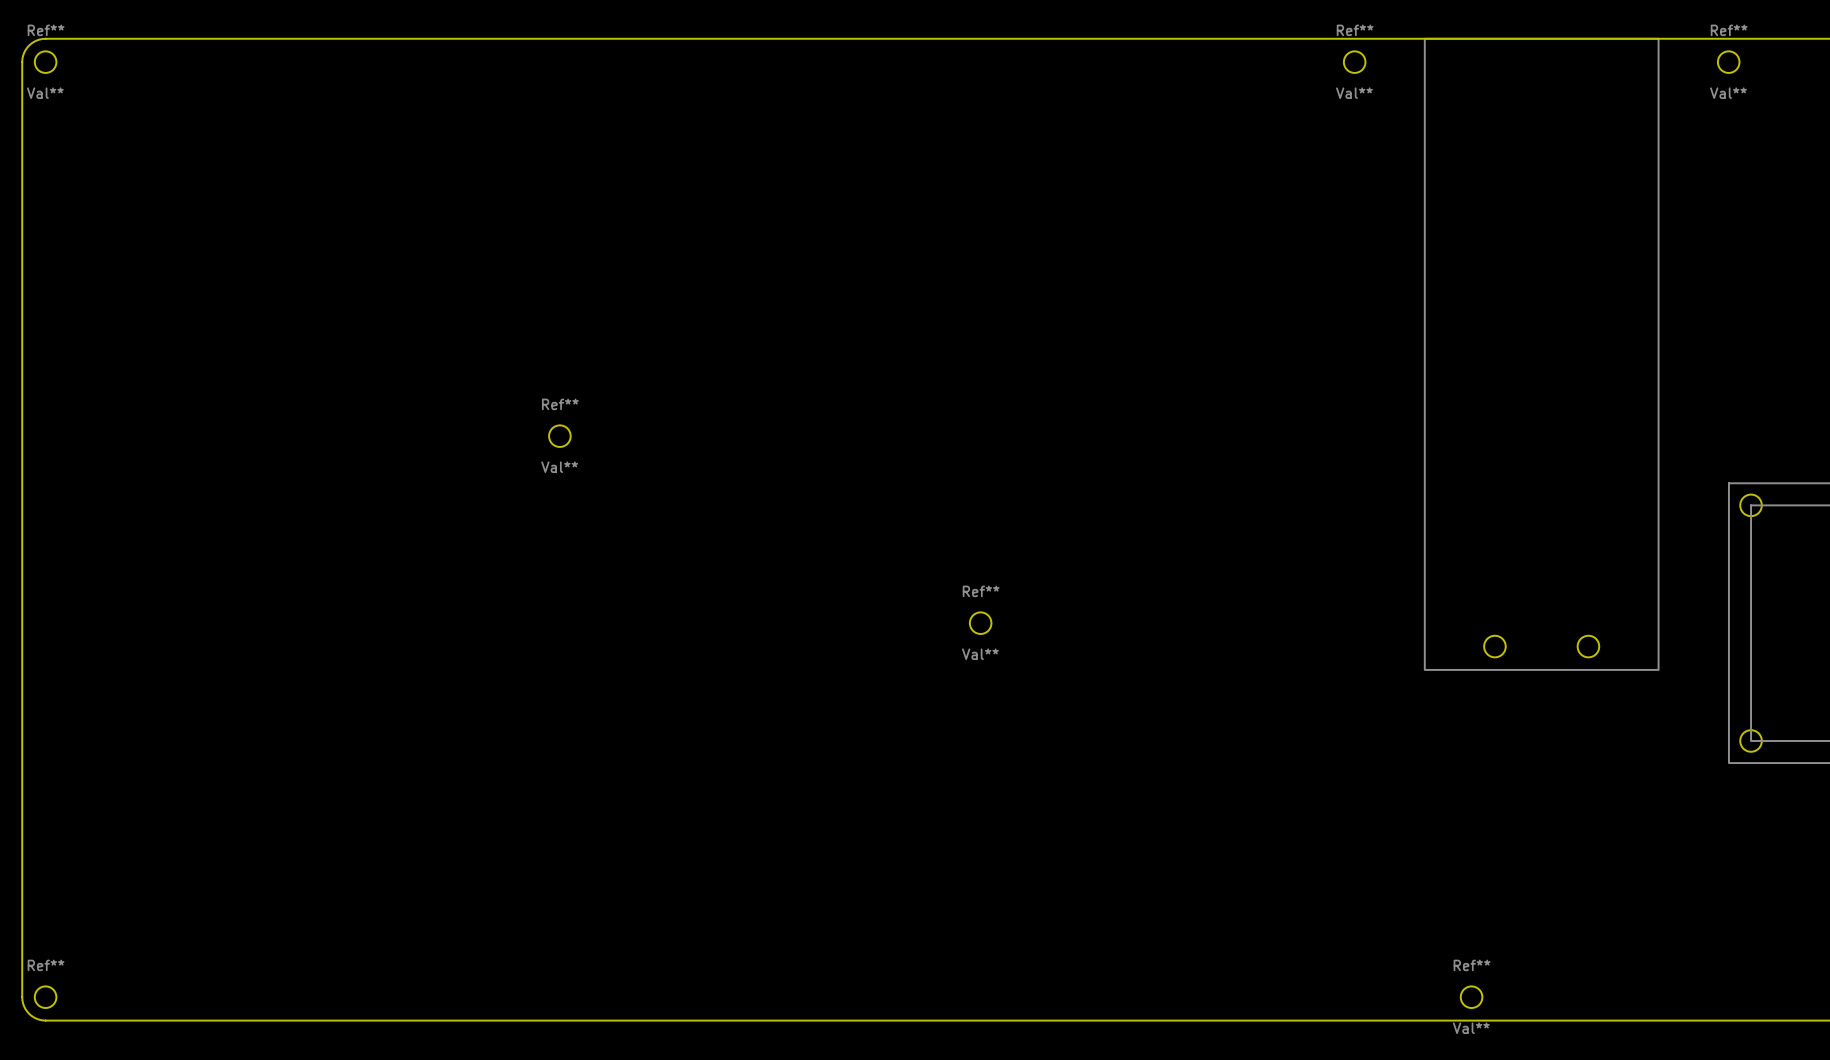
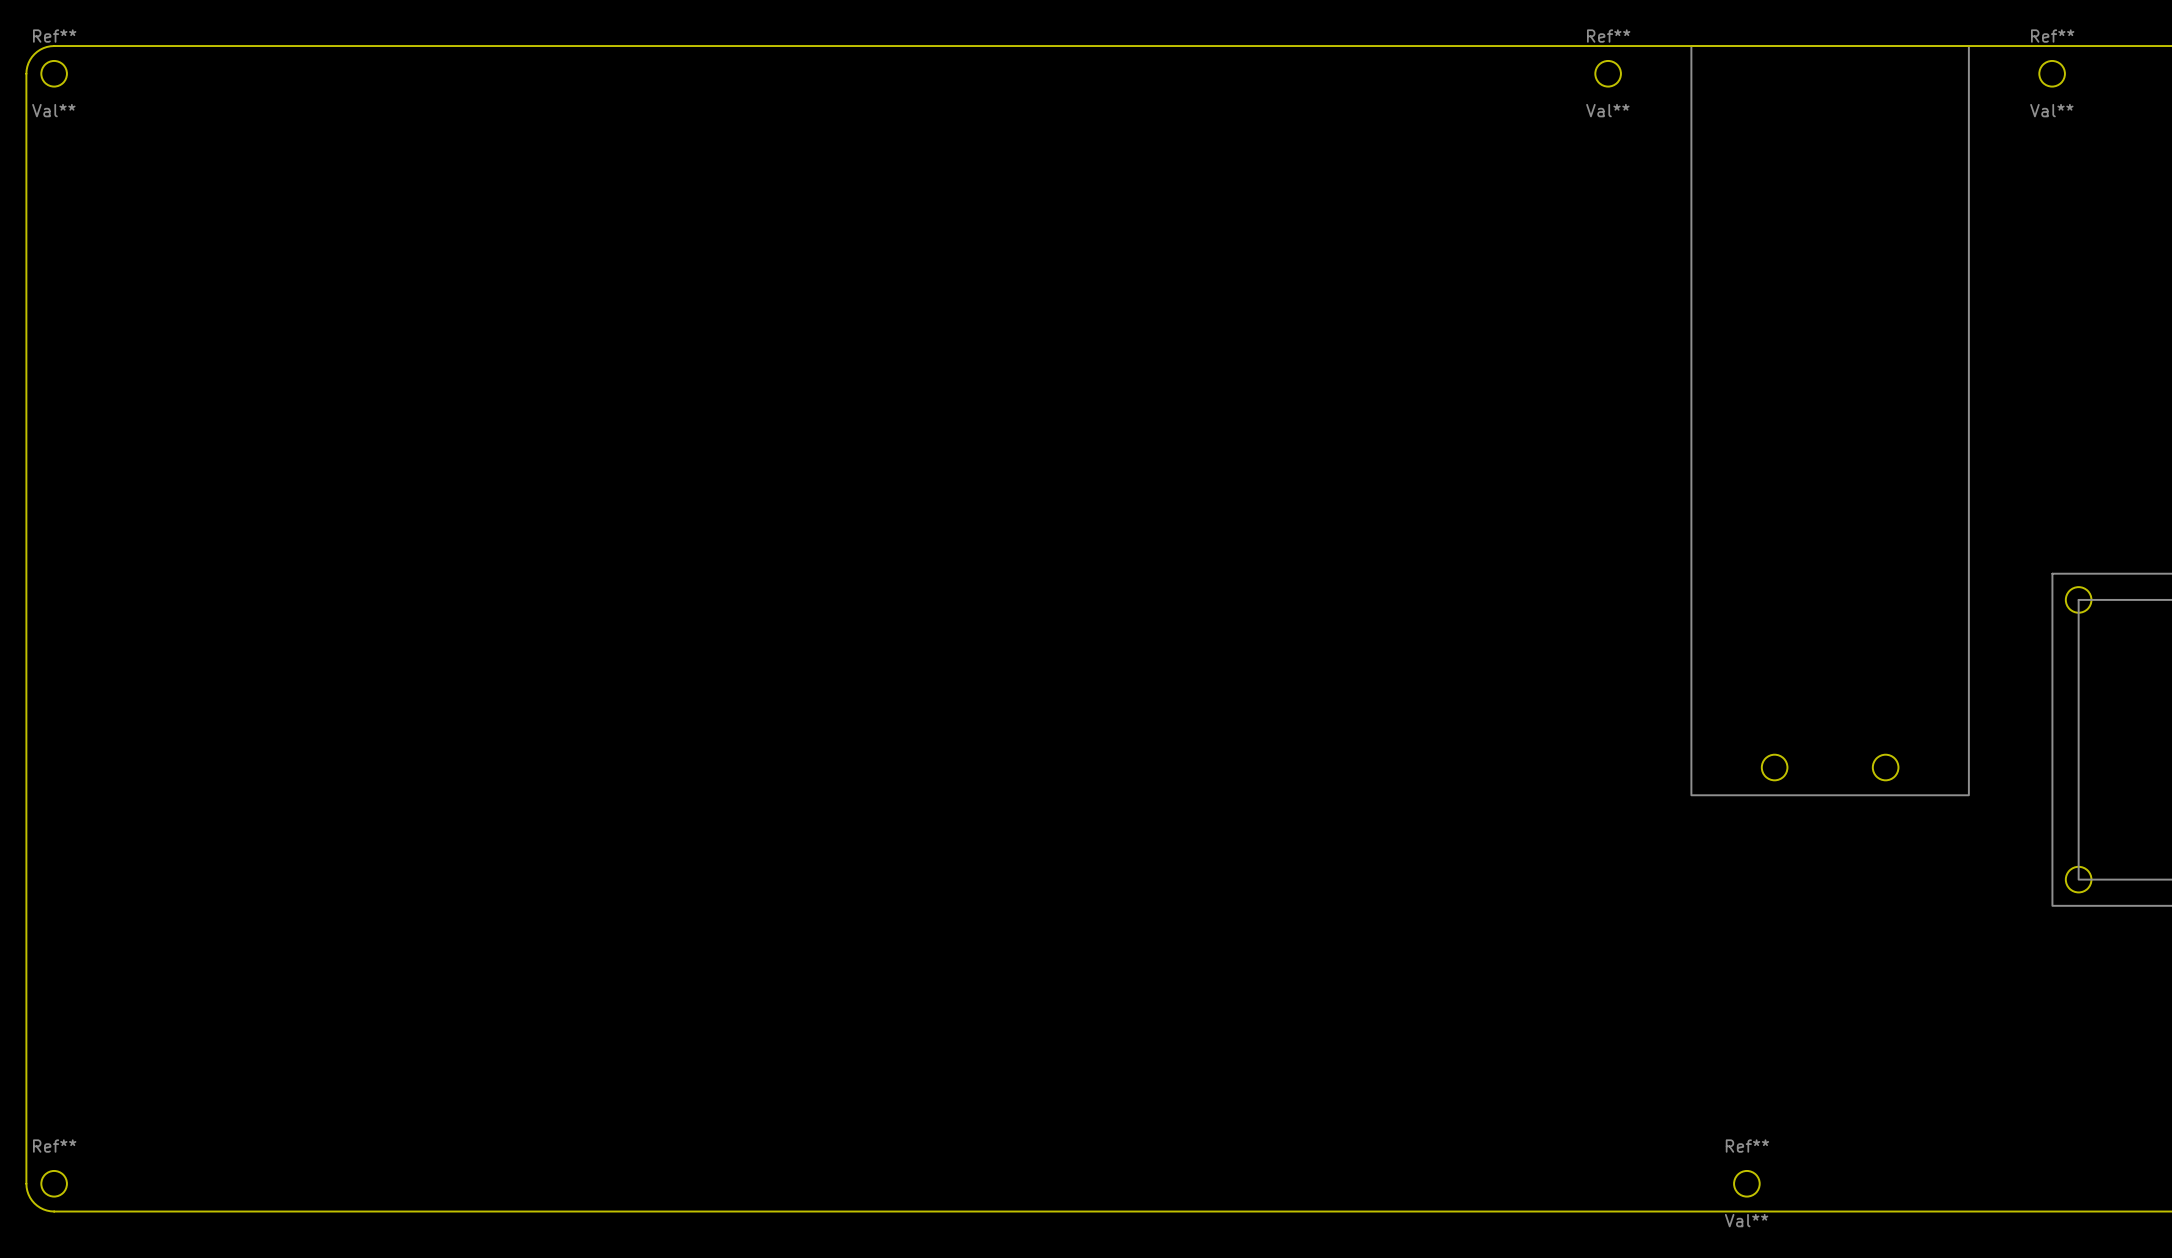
Ref**: Val** (559, 436) -> none
Ref**: Val** (980, 623) -> none

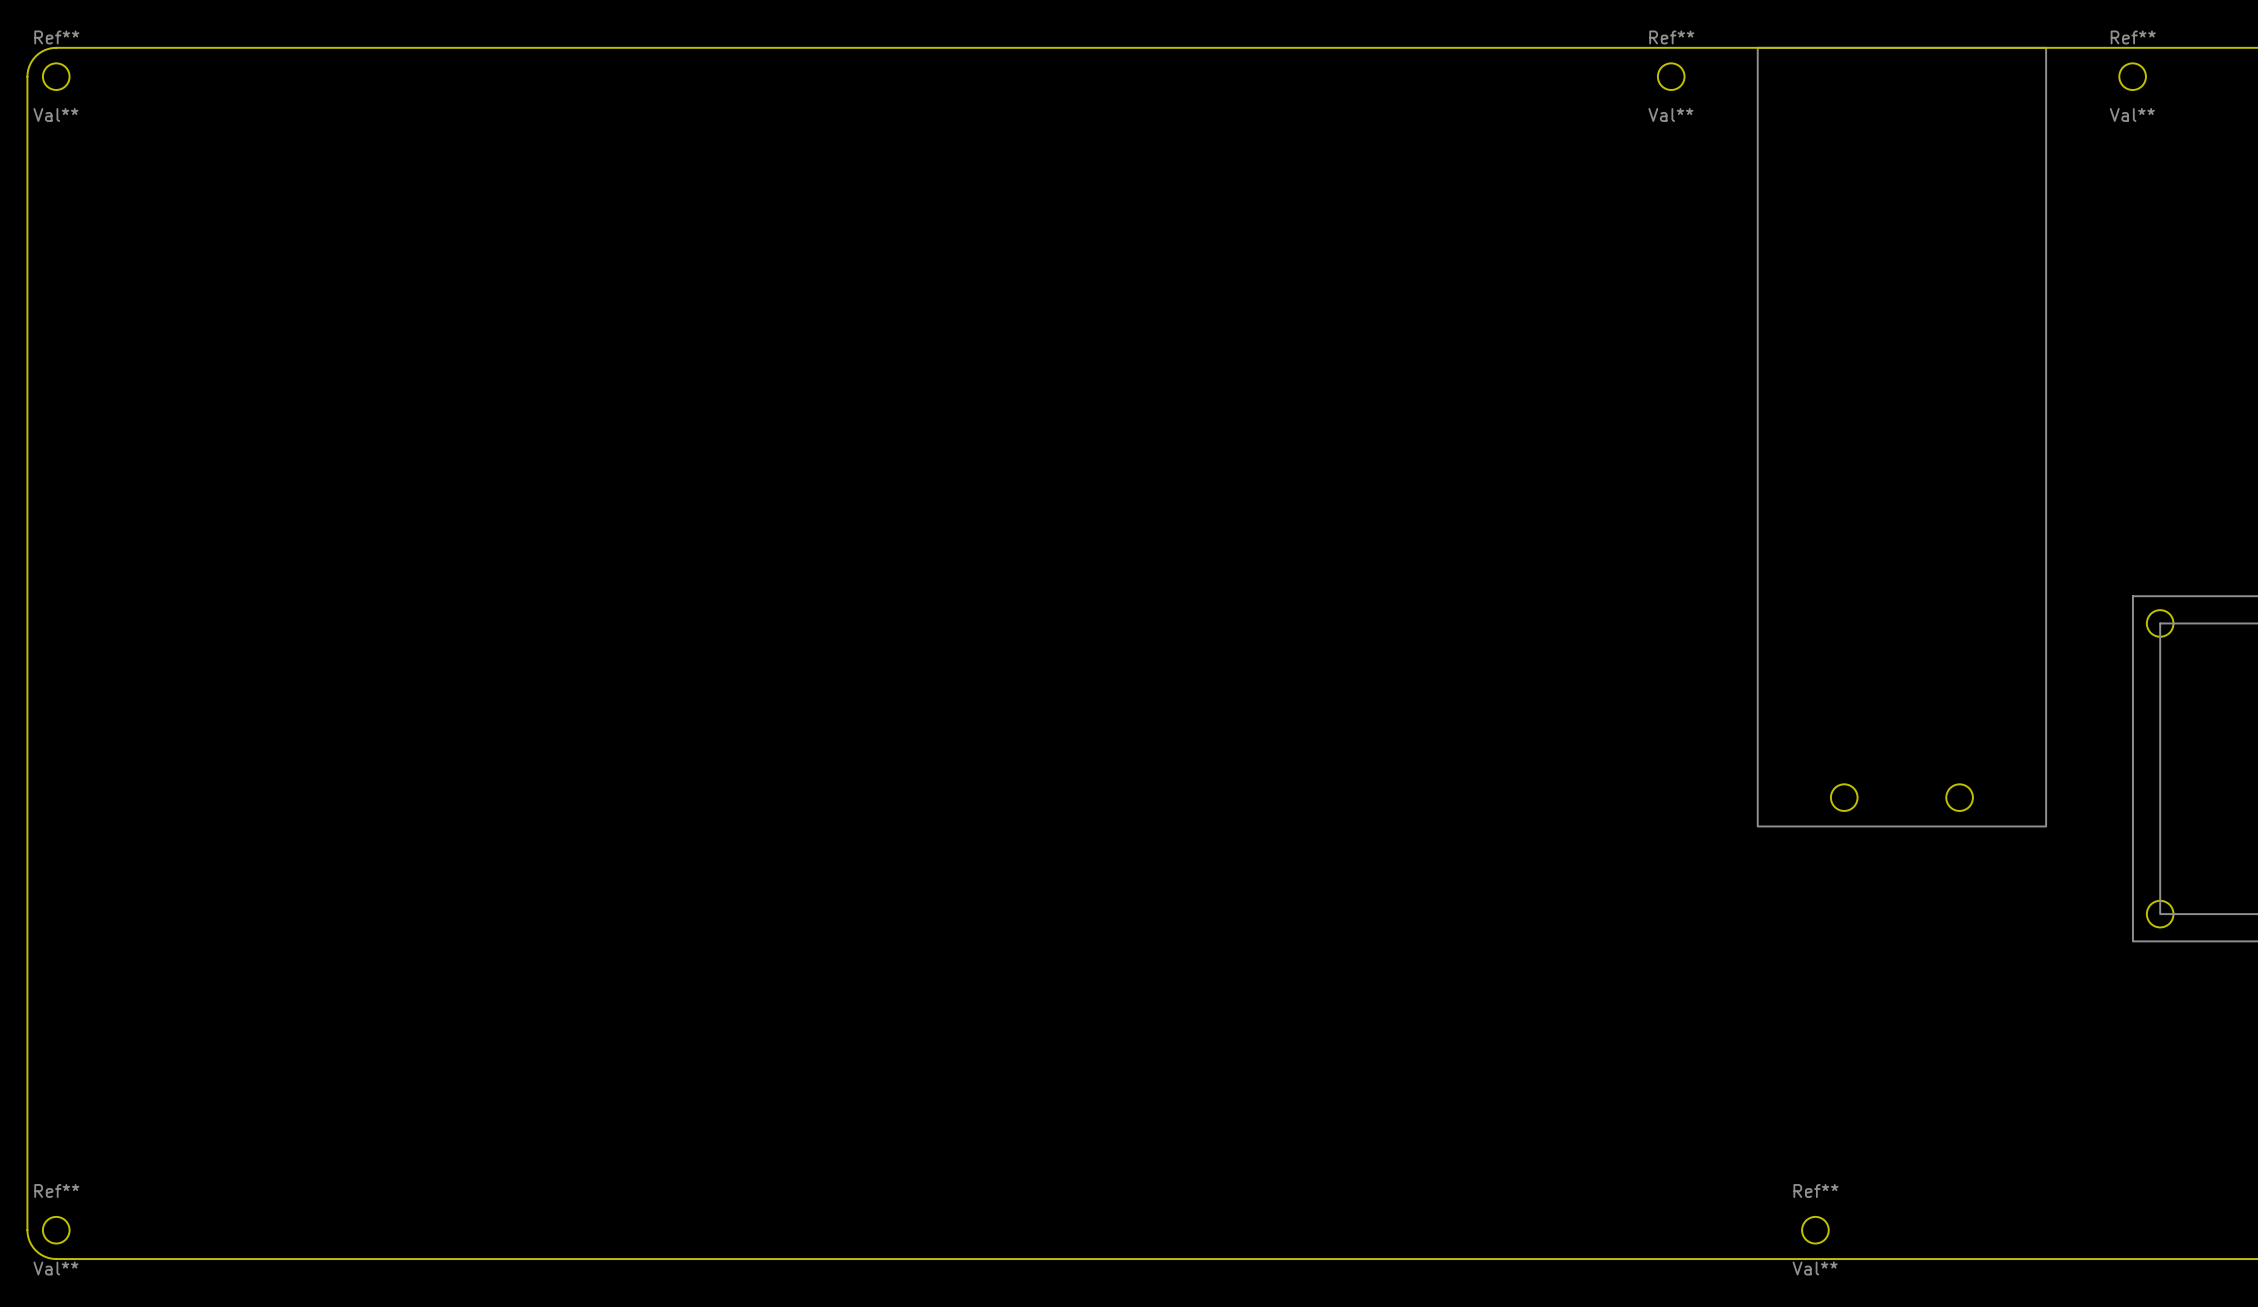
Ref** value: none -> Val** (55, 1268)

